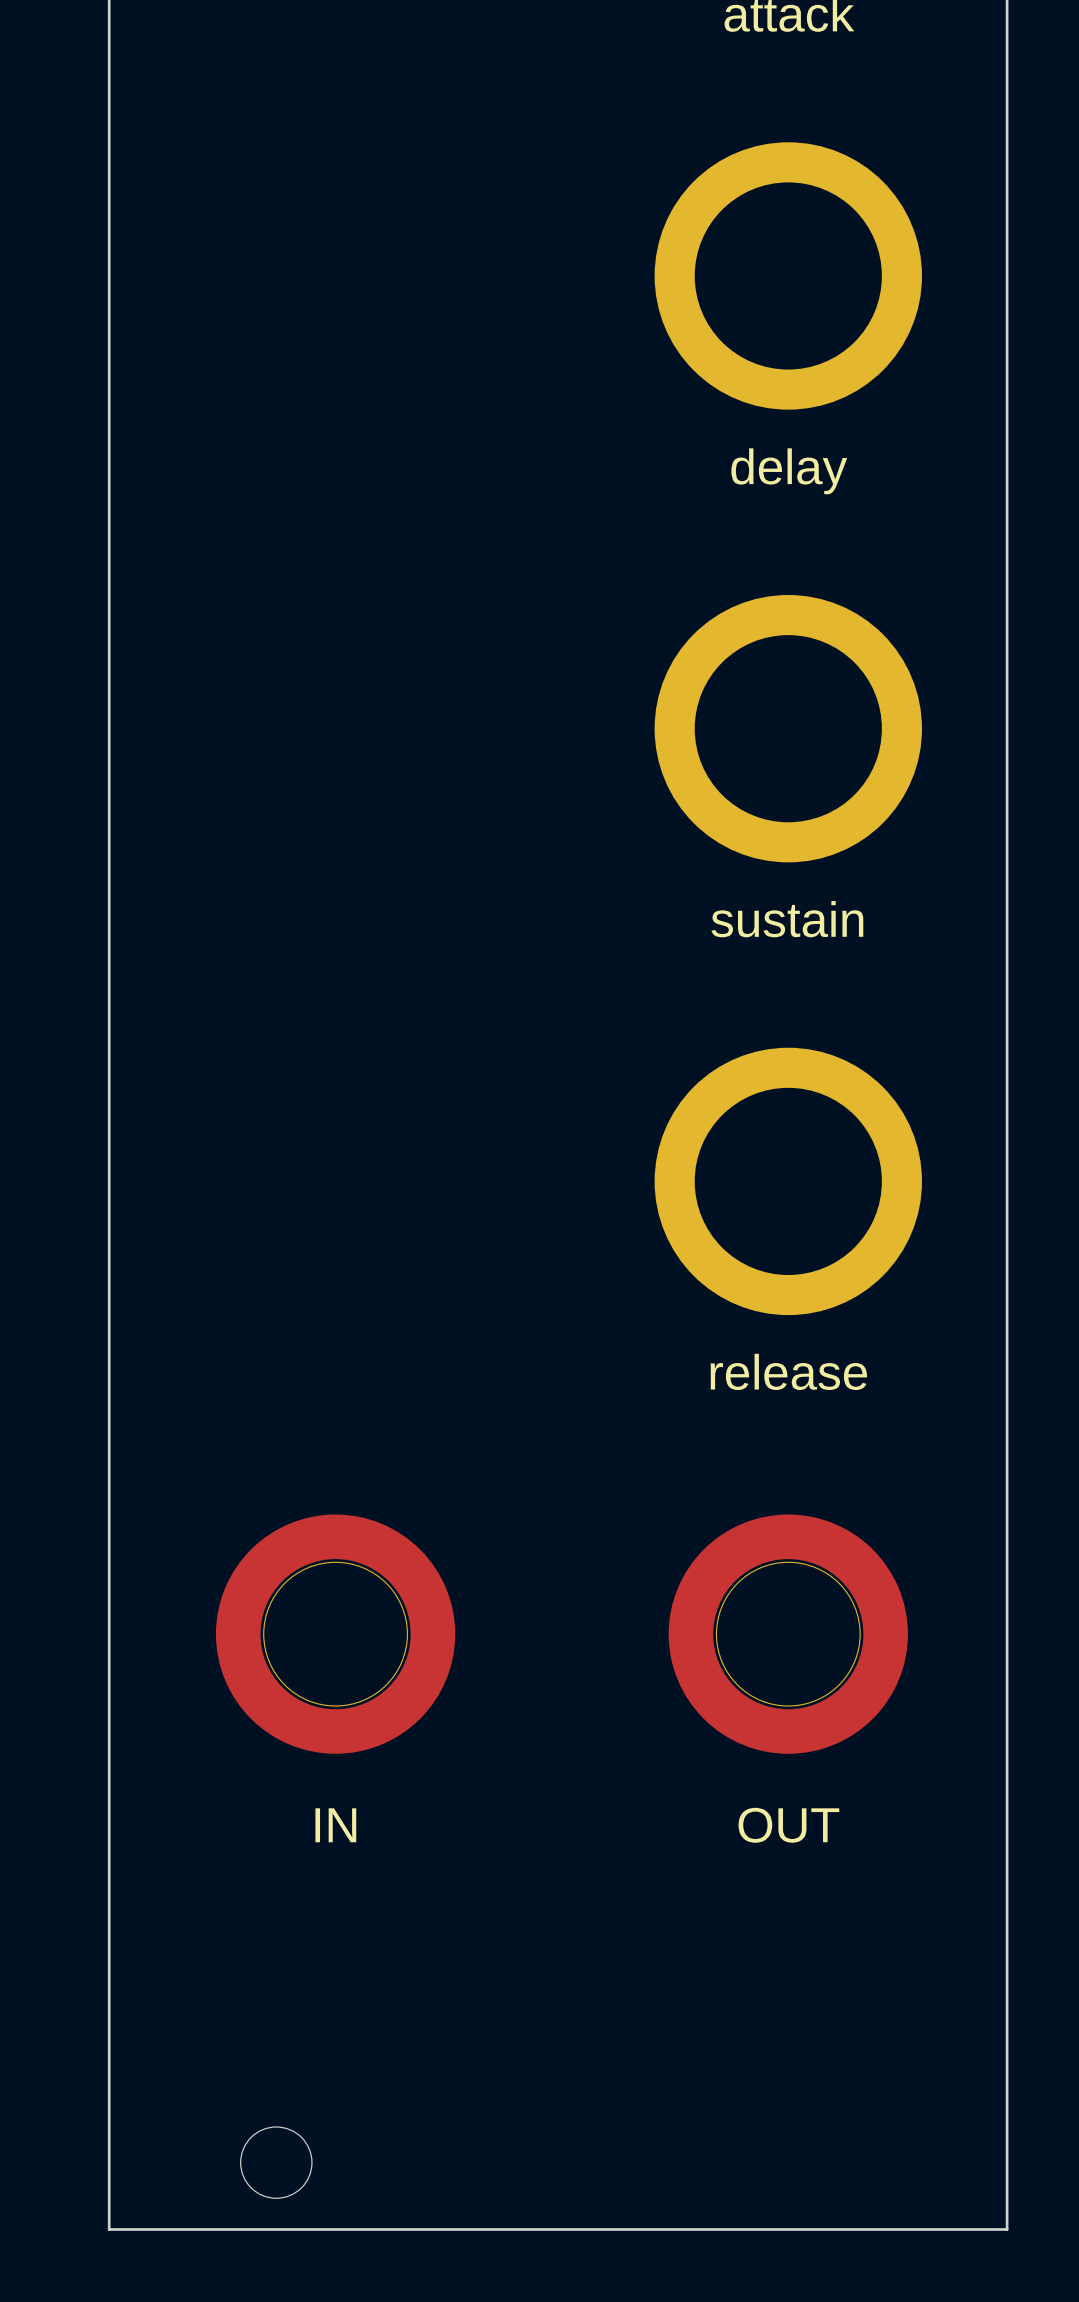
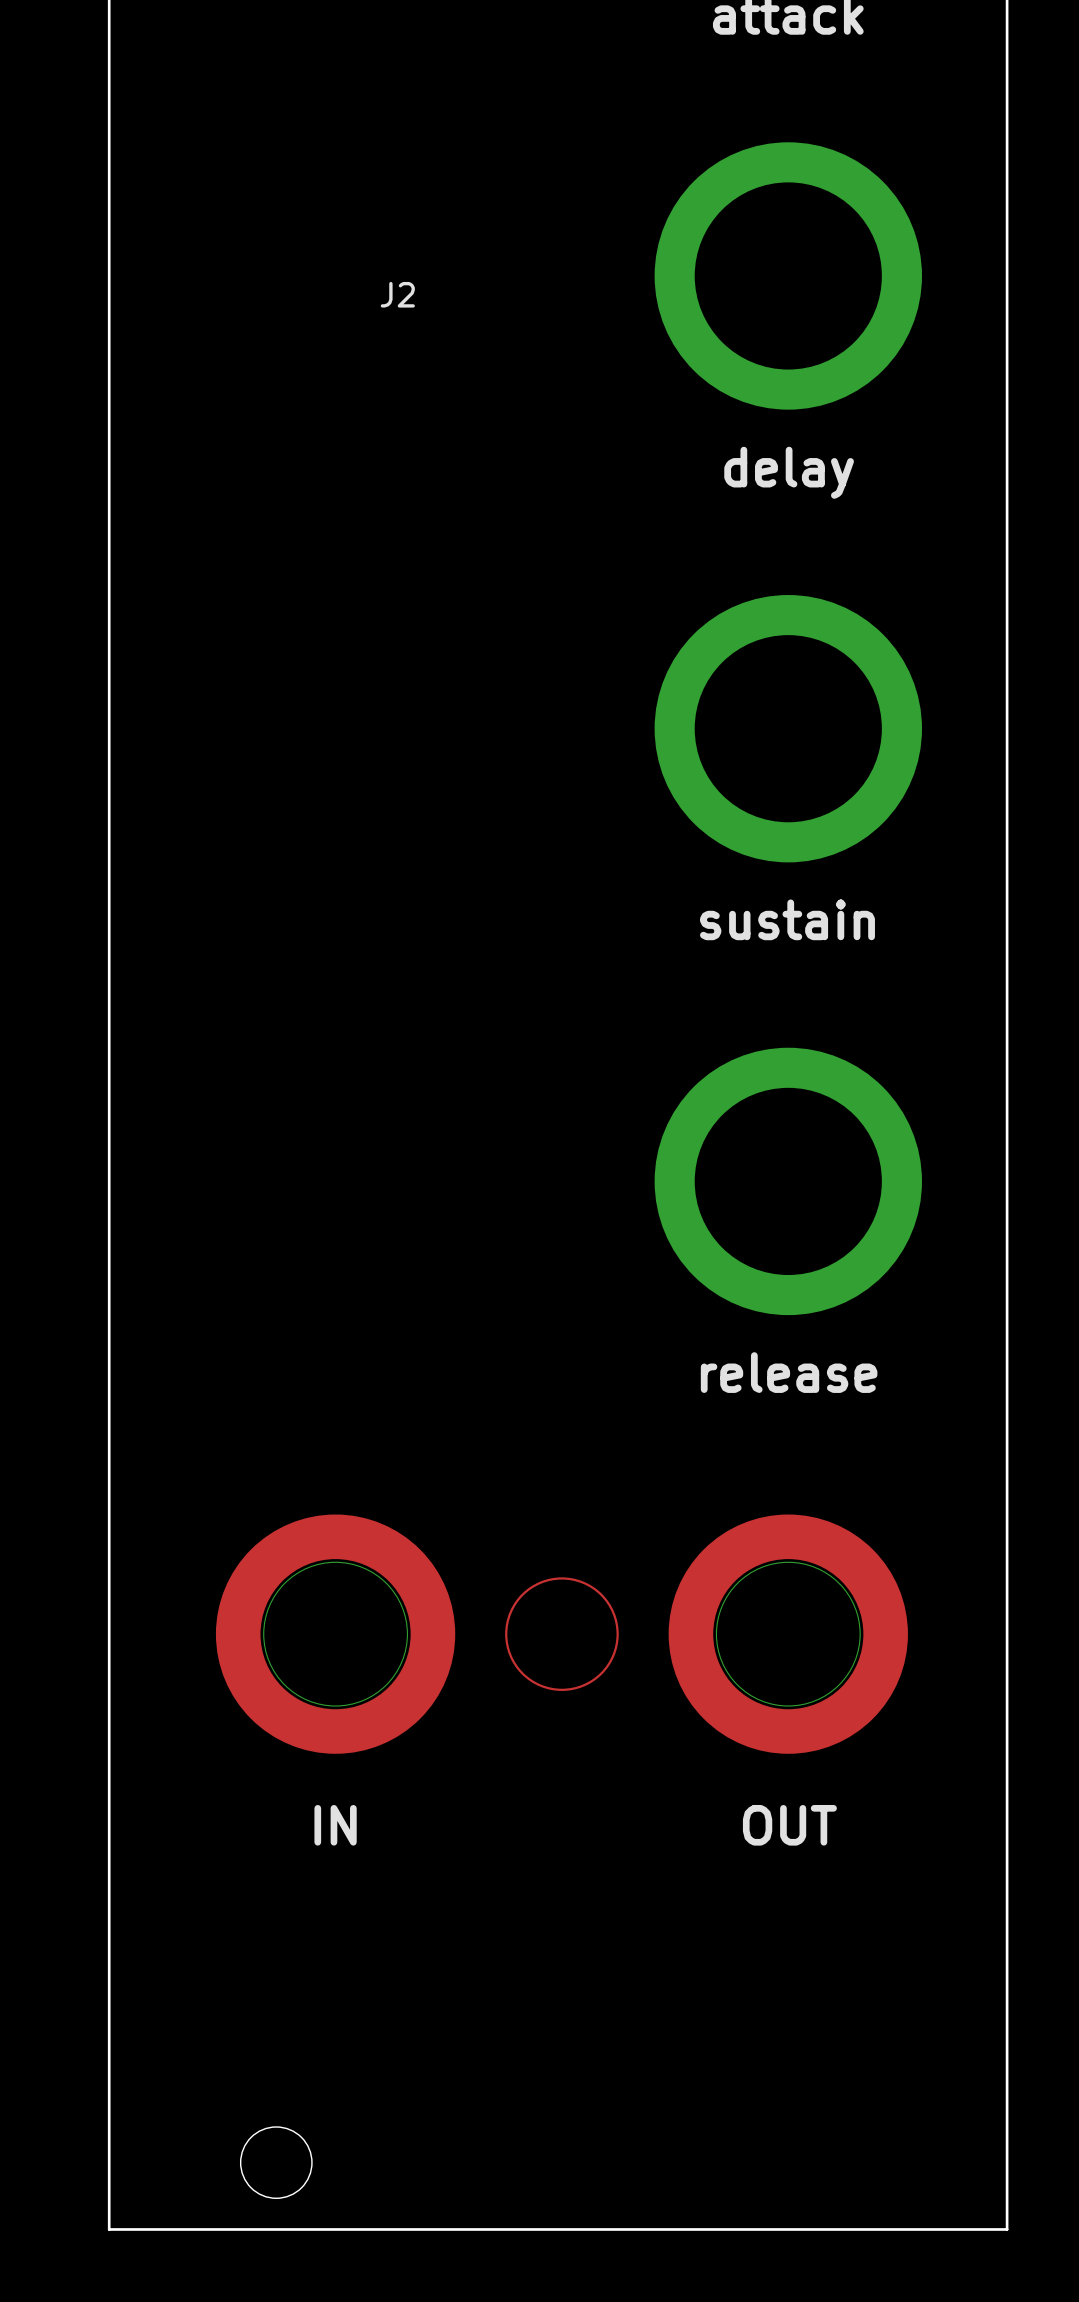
J2: none -> (397, 294)
drawing: none -> [505, 1577, 619, 1691]

